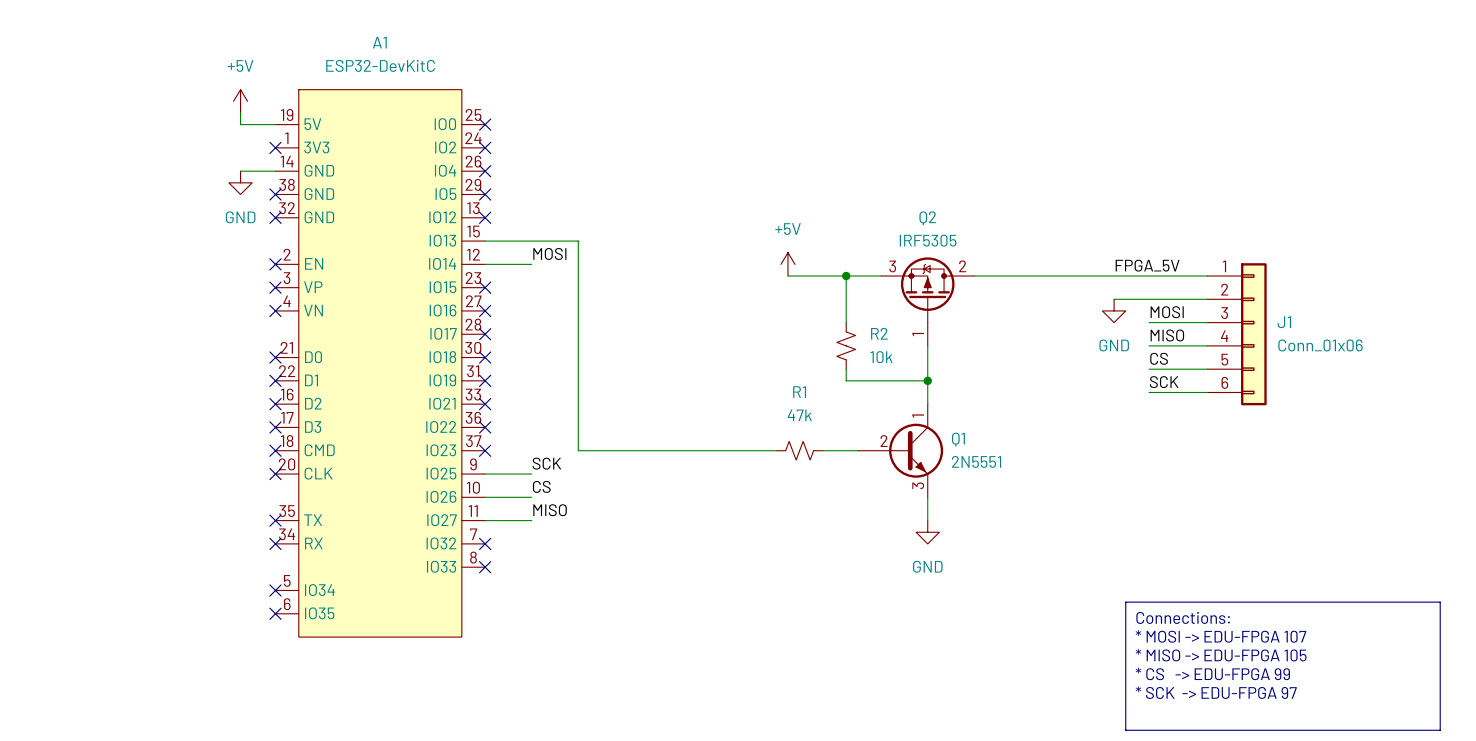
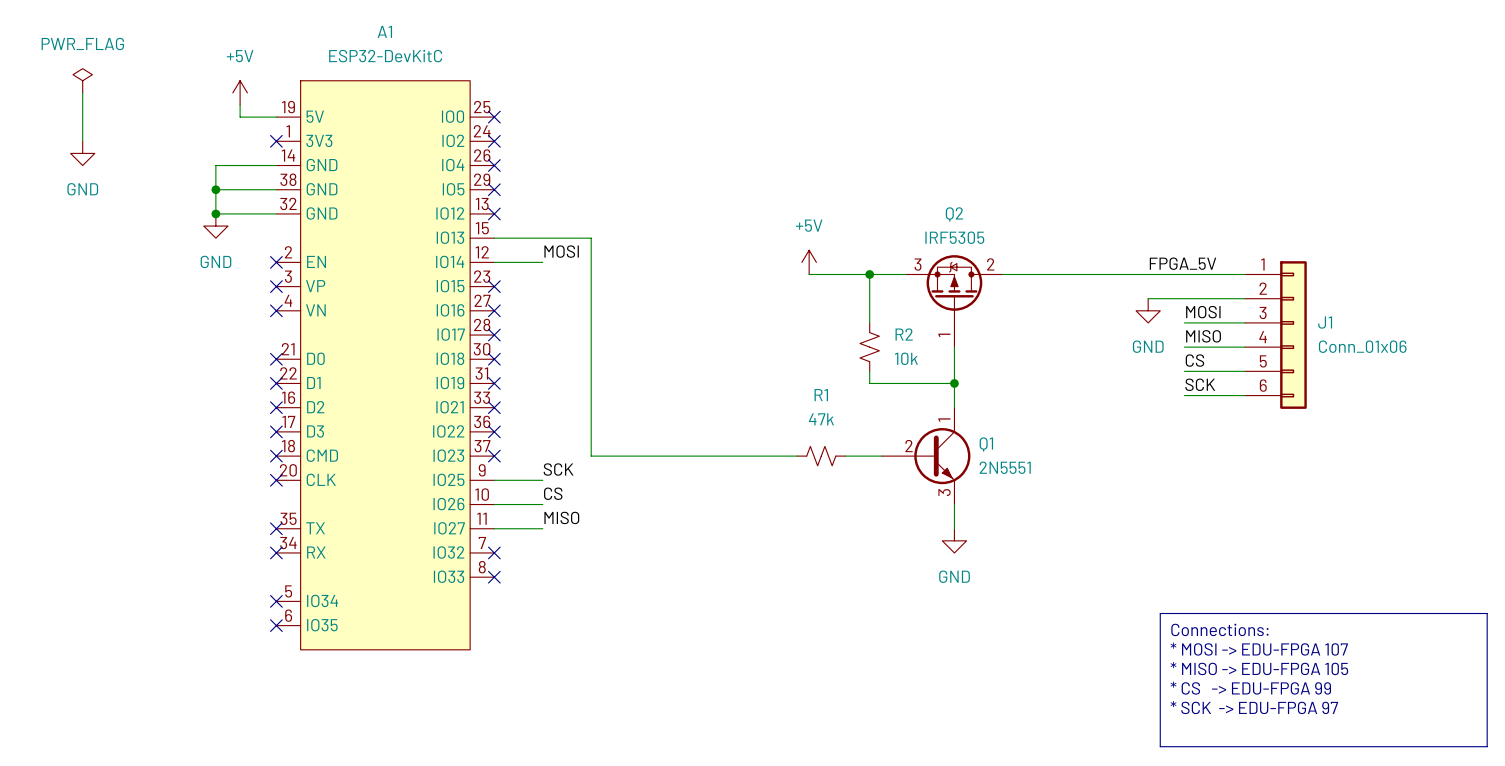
power symbol: none -> PWR_FLAG (82, 80)
wire: none -> (82, 92) (82, 141)
power symbol: none -> GND (82, 153)
wire: none -> (240, 165) (215, 165) (215, 213) (276, 213)
power symbol position: GND (240, 182) -> GND (215, 226)
wire: none -> (215, 189) (276, 189)
junction: none -> (215, 189)
no-connect mark: (275, 194) -> none
junction: none -> (215, 213)
no-connect mark: (275, 217) -> none

